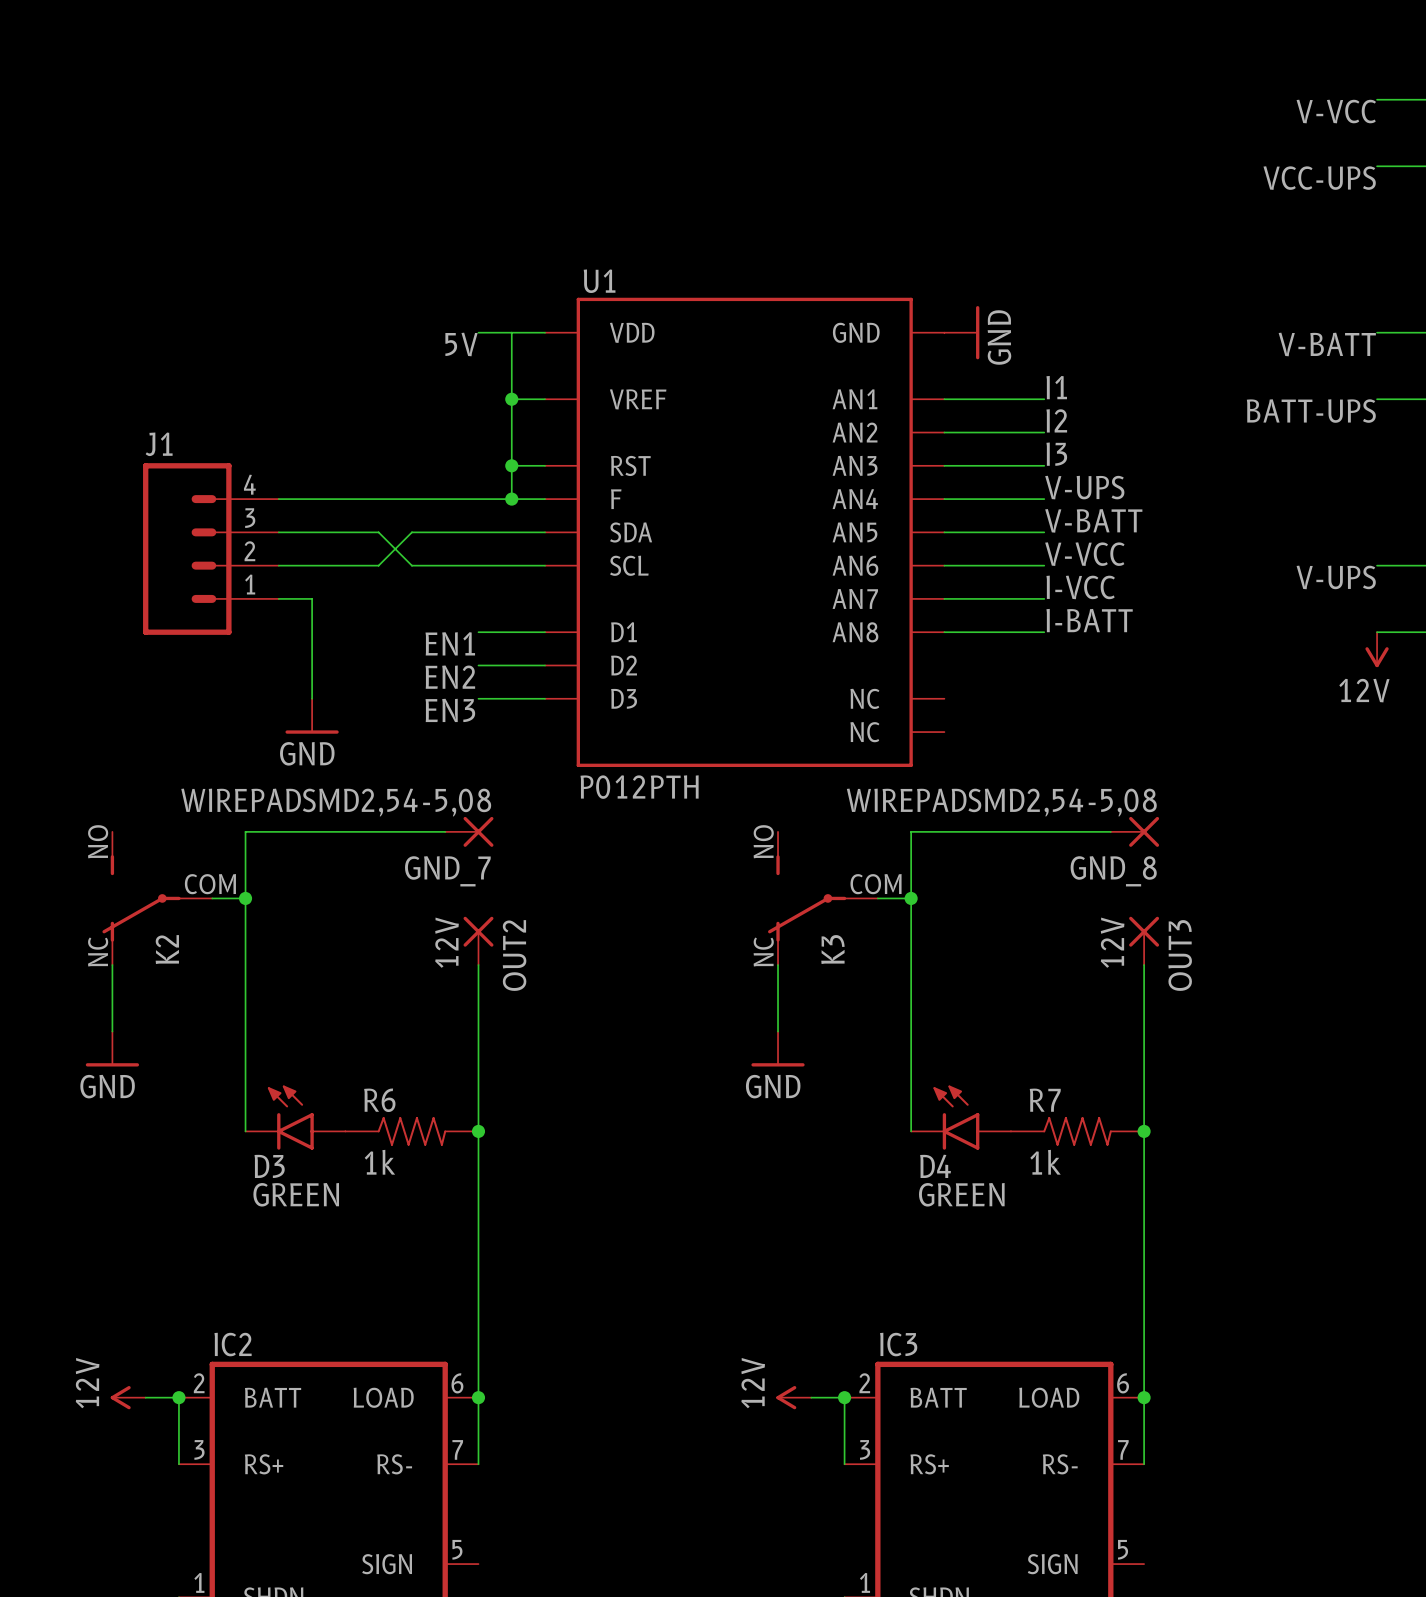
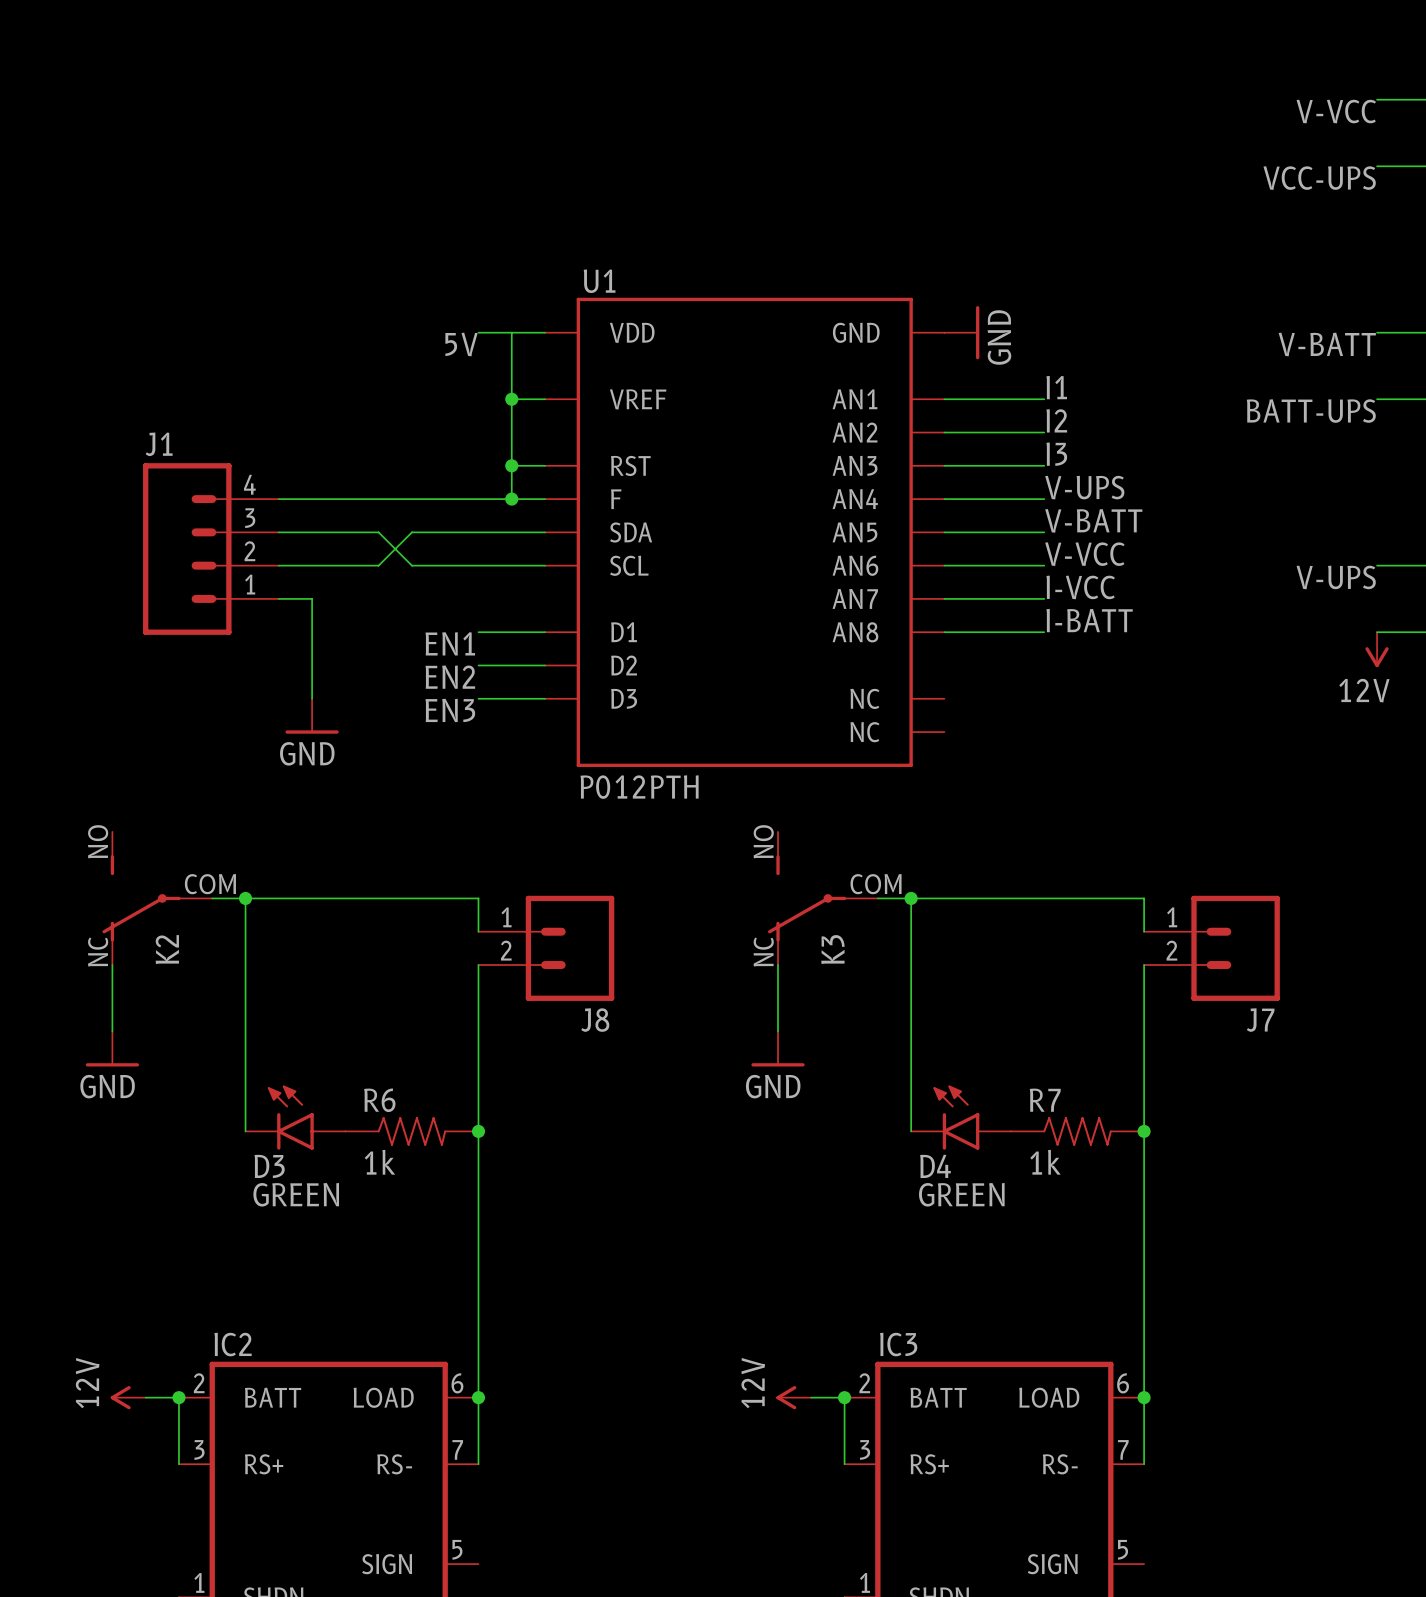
wire: (445, 831) (245, 831) (245, 898) -> (478, 931) (478, 898) (245, 898)
GND_7: WIREPADSMD2,54-5,08 (469, 831) -> none
wire: (1110, 831) (911, 831) (911, 898) -> (1144, 931) (1144, 898) (911, 898)
GND_8: WIREPADSMD2,54-5,08 (1134, 831) -> none
OUT2: 12V (478, 940) -> none
OUT3: 12V (1144, 940) -> none
J8: none -> (546, 948)
J7: none -> (1211, 948)

